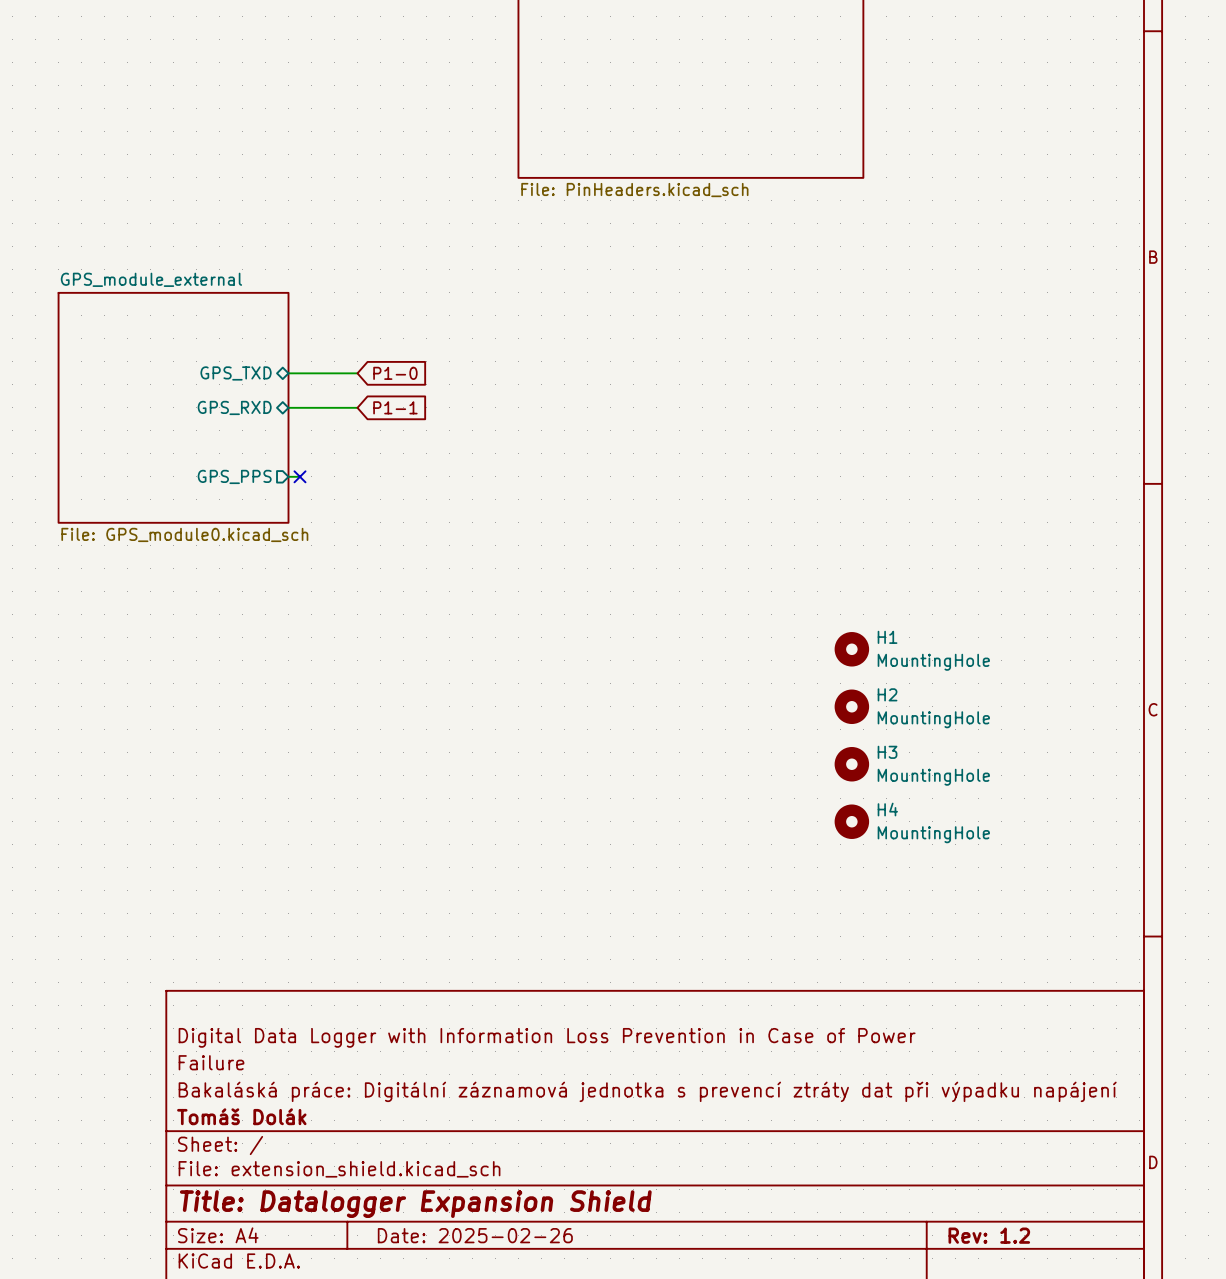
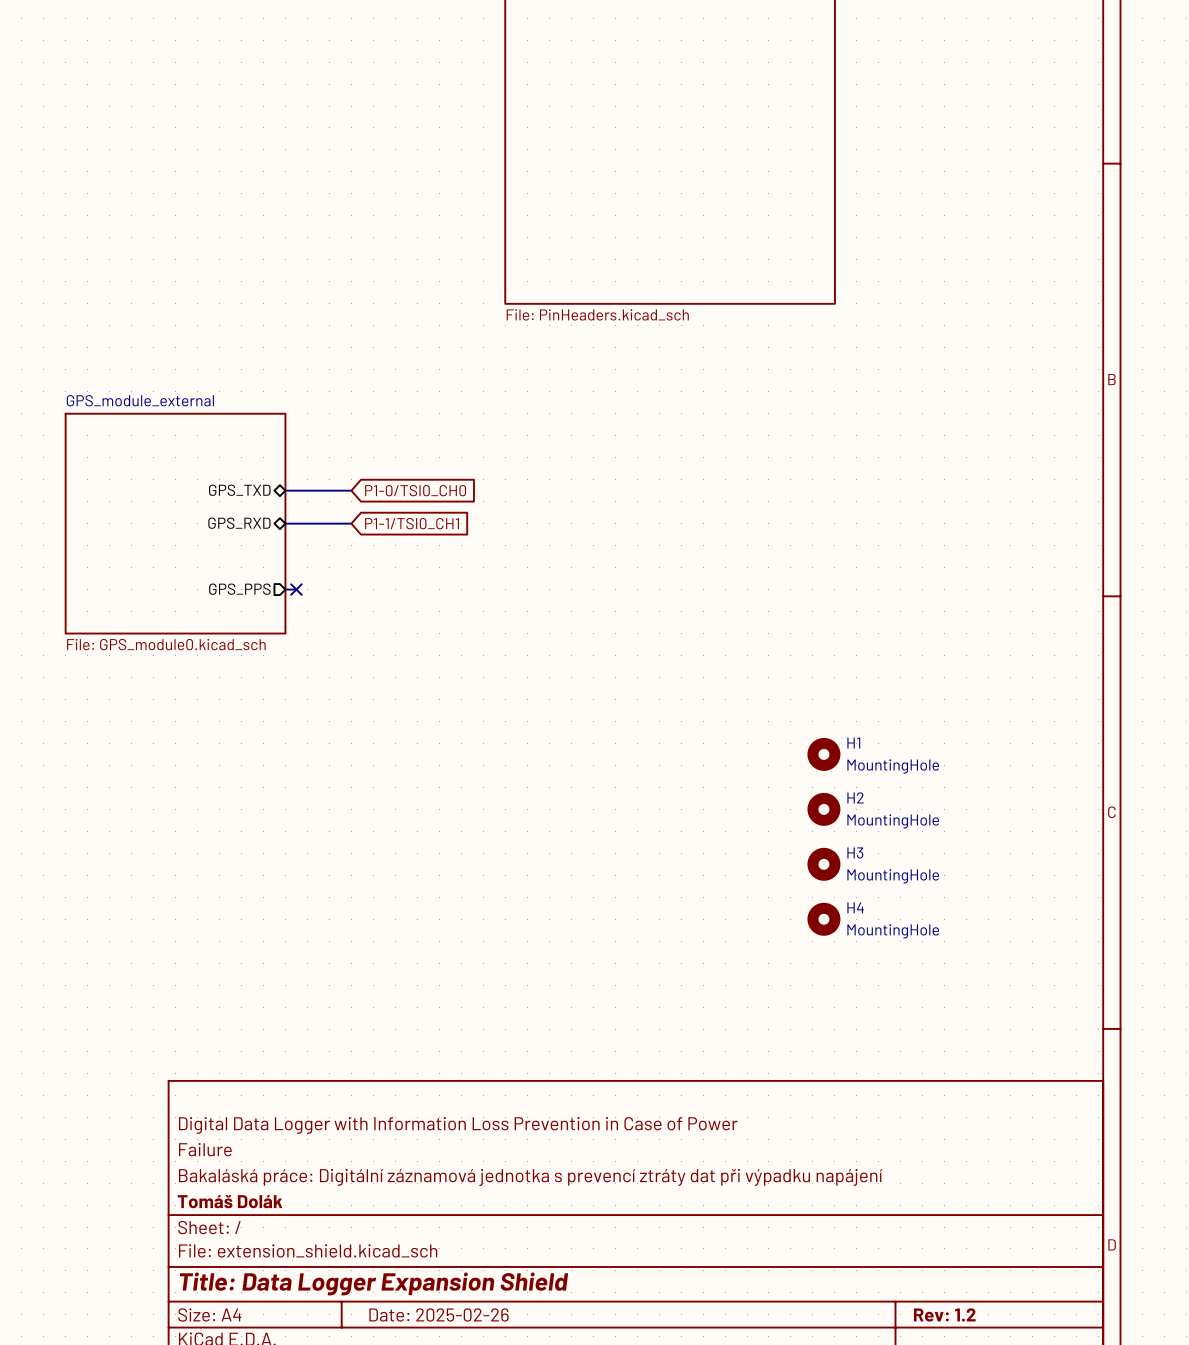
global label: P1-0 (395, 373) -> P1-0/TSI0_CH0 (415, 490)
global label: P1-1 (395, 407) -> P1-1/TSI0_CH1 (412, 523)
title block: Title: Datalogger Expansion Shield (415, 1204) -> Title: Data Logger Expansion Shield (373, 1283)

